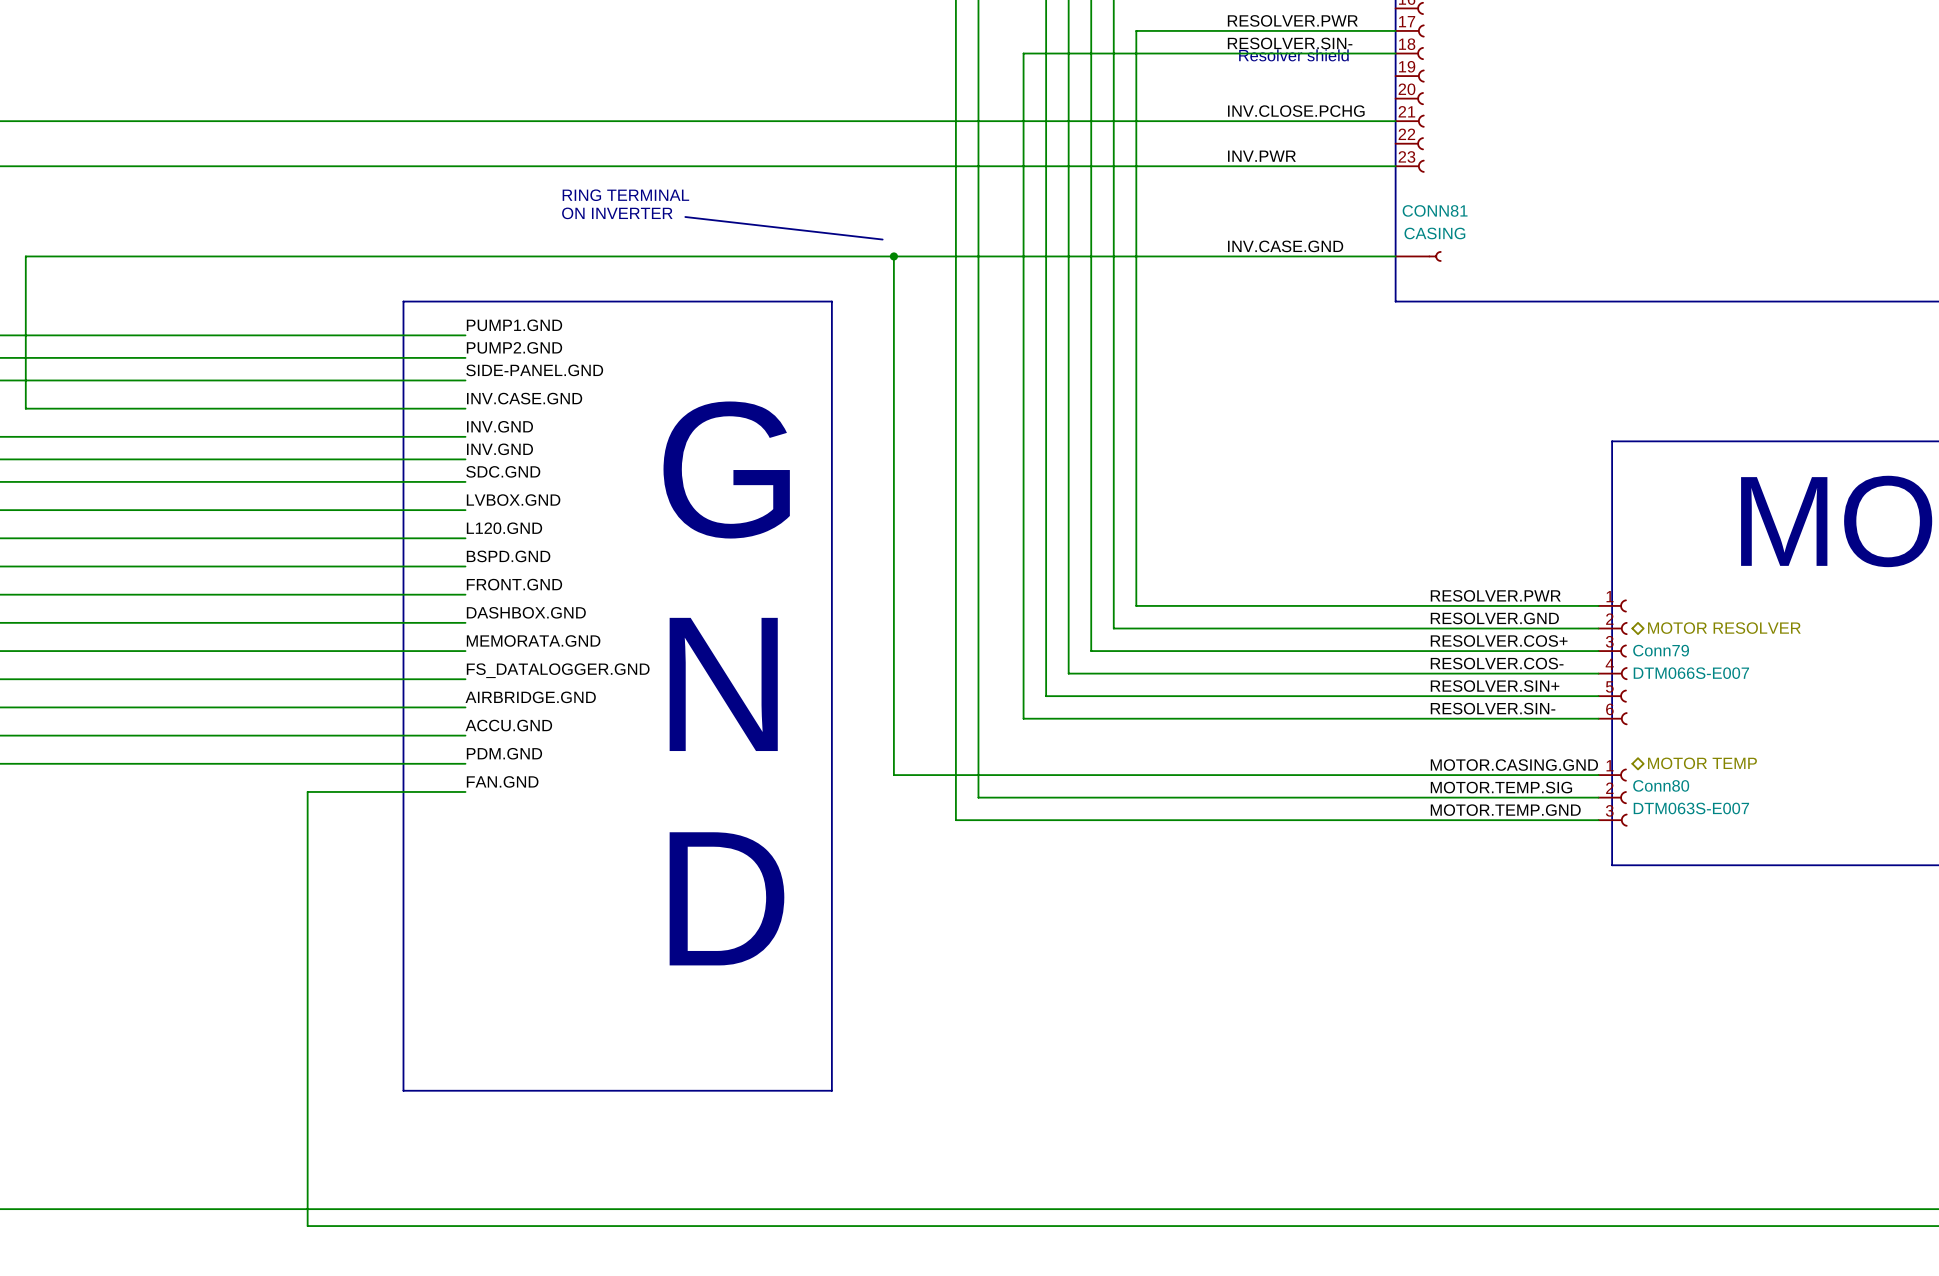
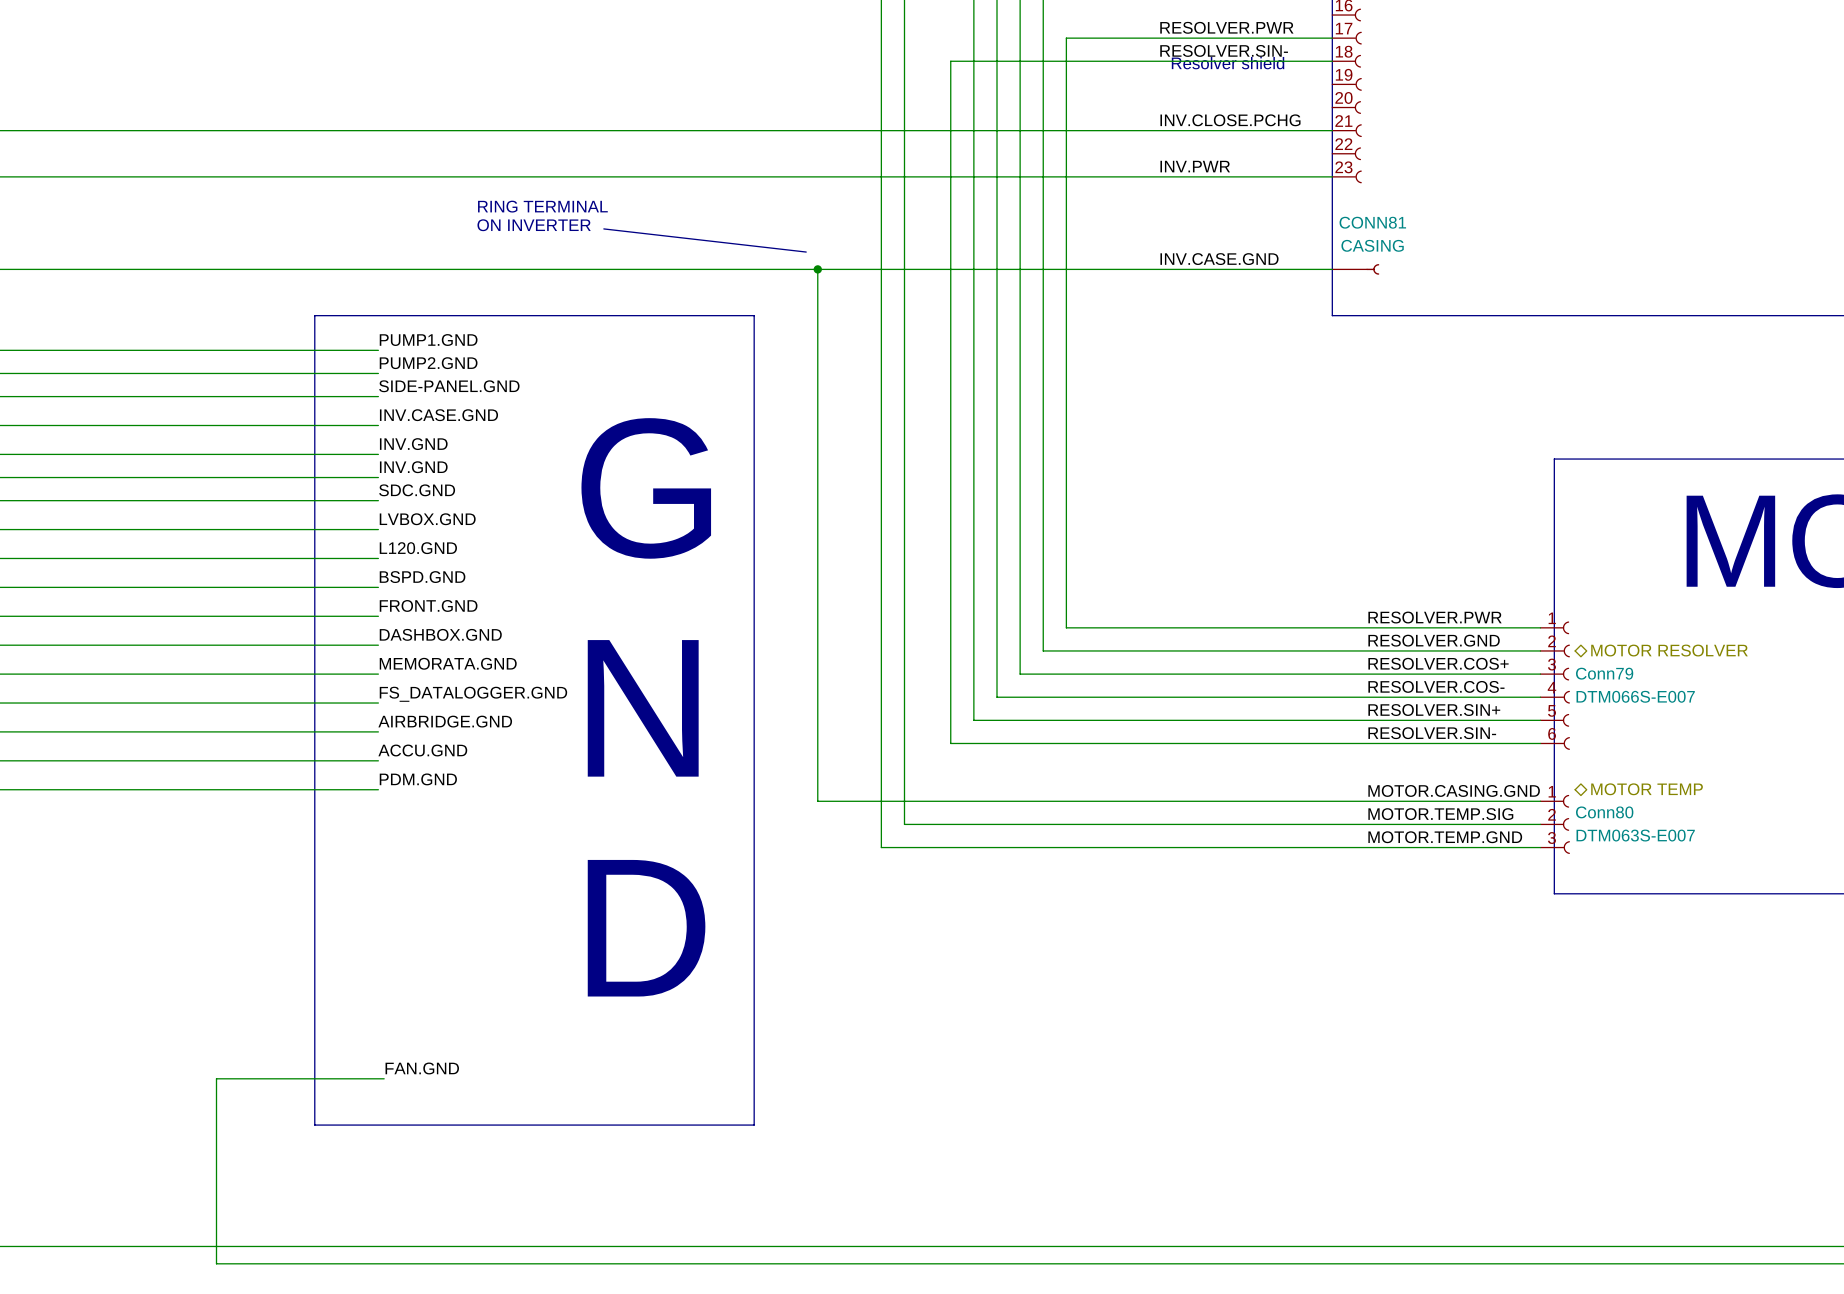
label: FAN.GND (502, 781) -> none
wire: (465, 791) (307, 791) (307, 1045) -> (384, 1078) (216, 1078)
label: none -> FAN.GND (422, 1068)

